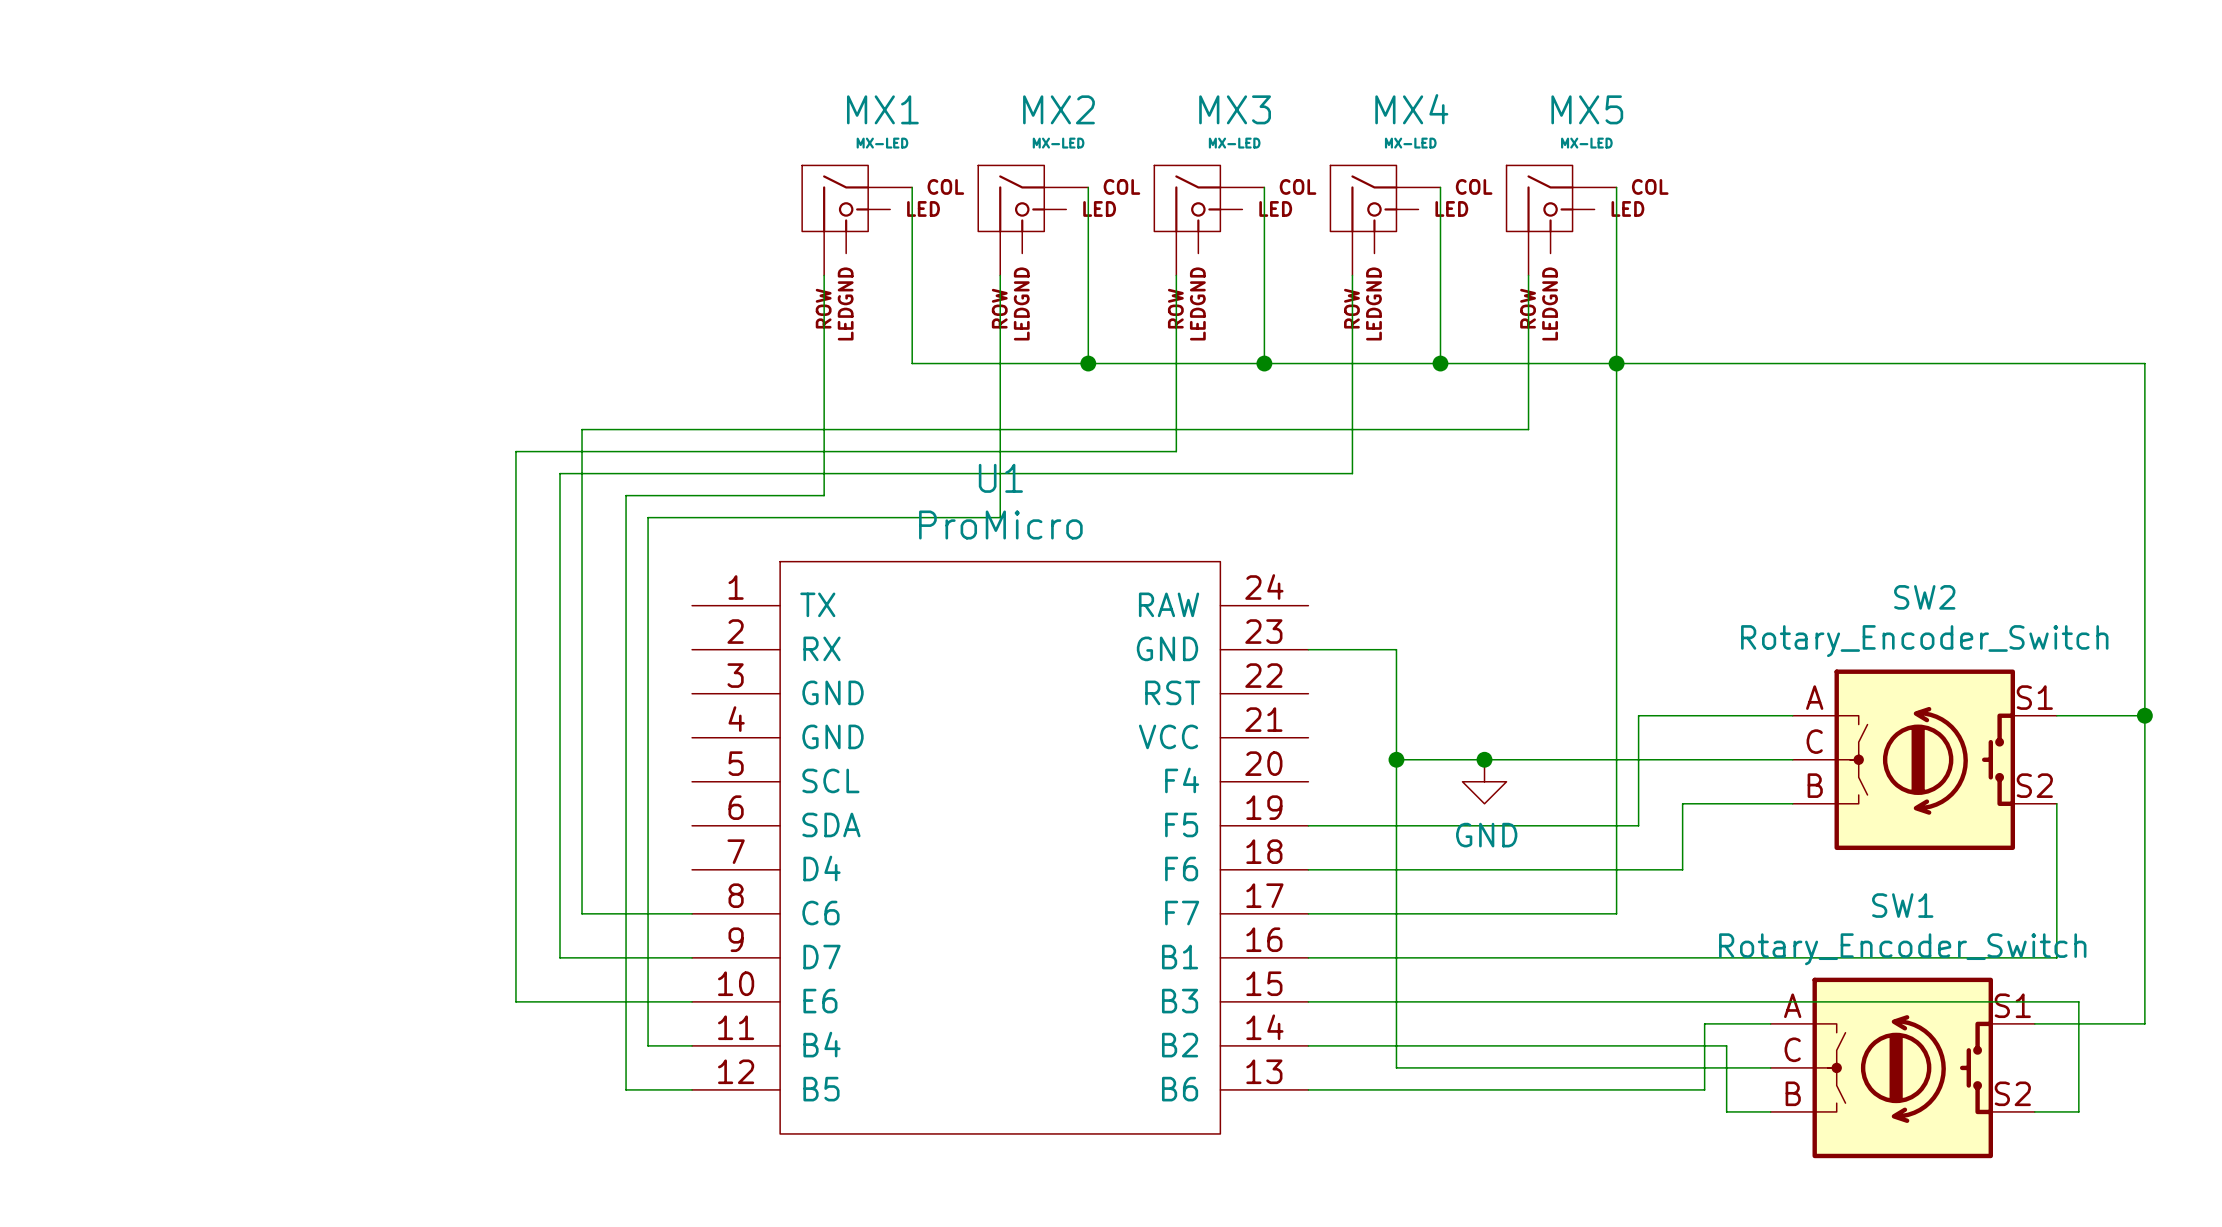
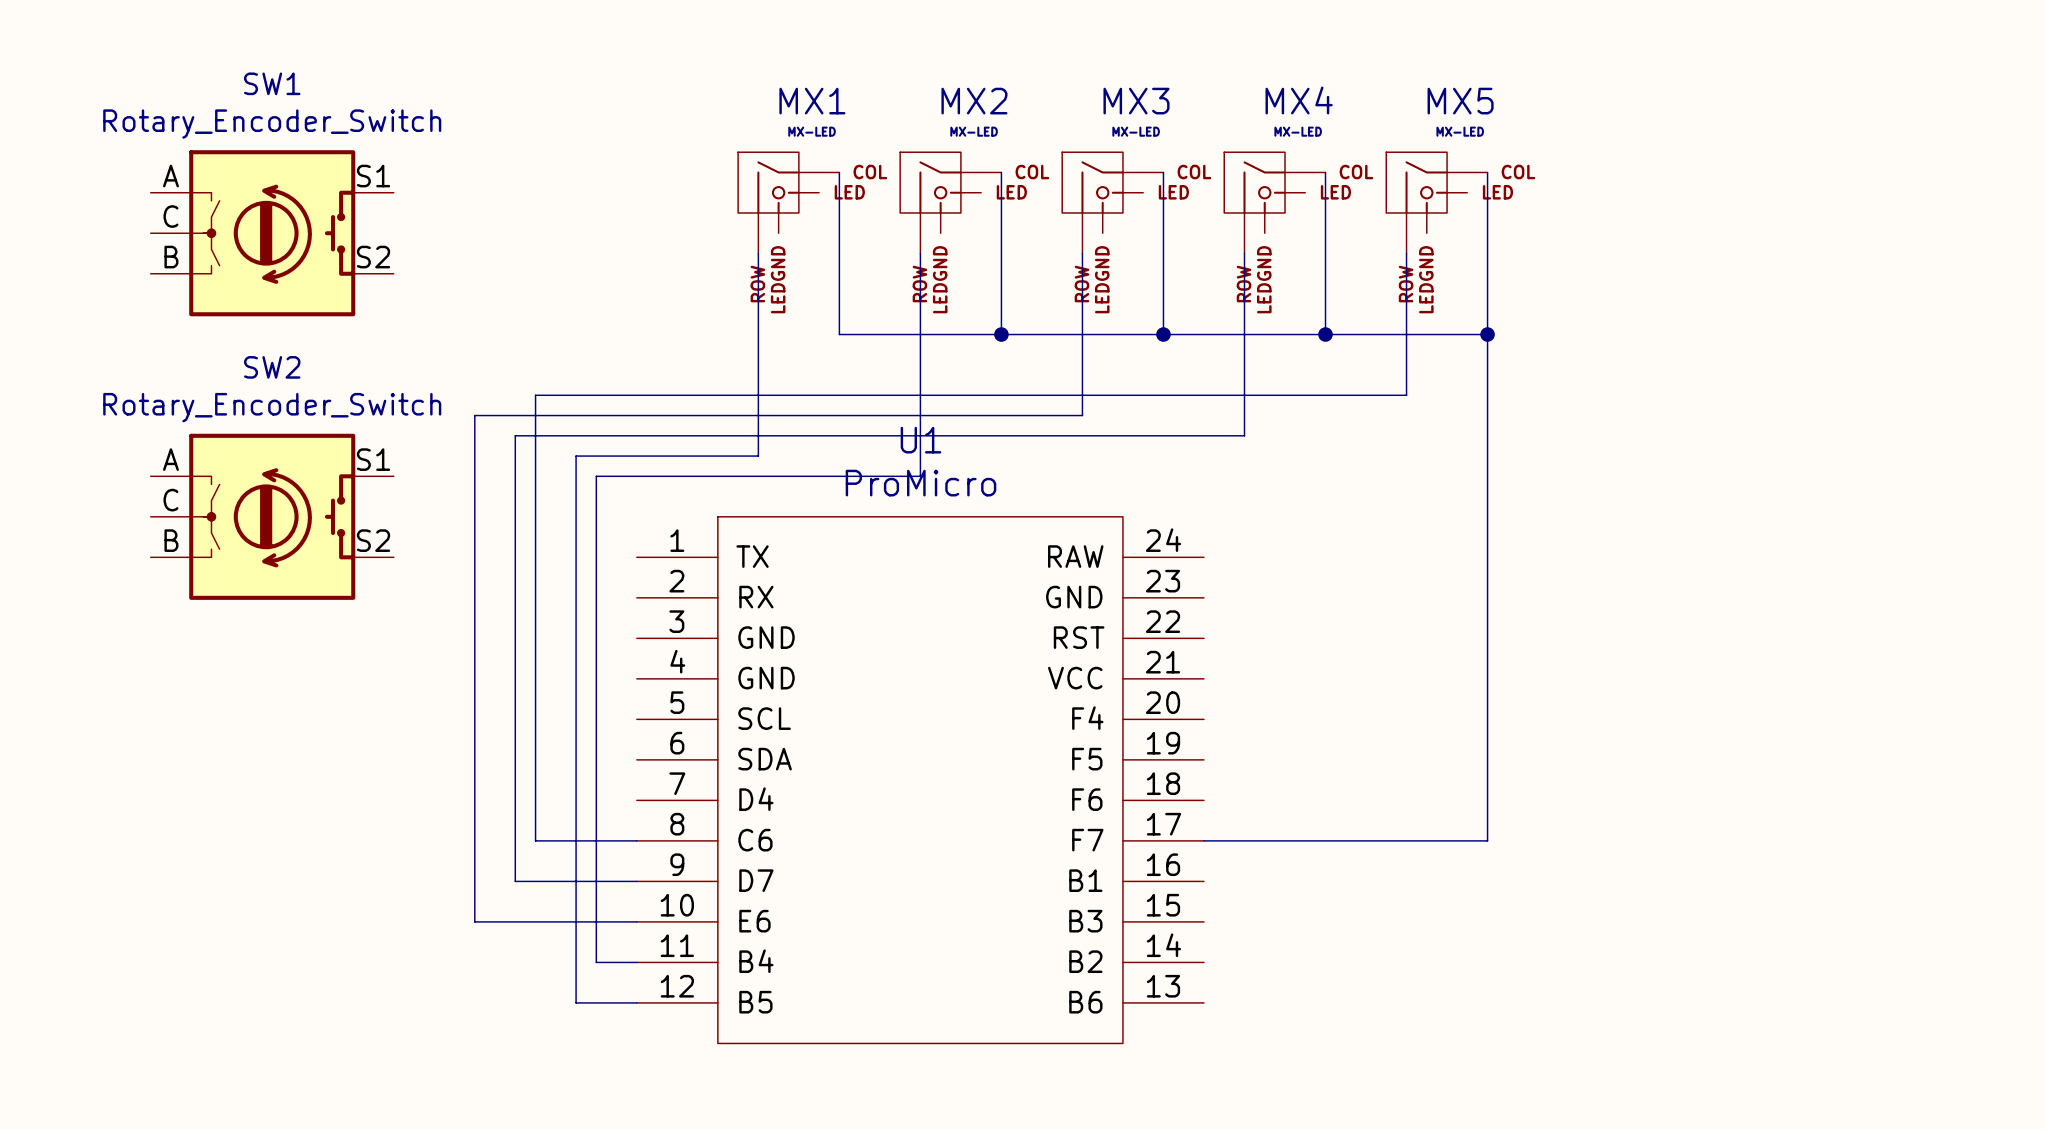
wire: (1616, 363) (2144, 363) (2144, 1023) (2034, 1023) -> none
wire: (1308, 649) (1396, 649) (1396, 1067) (1770, 1067) -> none
wire: (1792, 715) (1638, 715) (1638, 825) (1308, 825) -> none
wire: (2056, 715) (2144, 715) -> none
junction: (2144, 715) -> none
wire: (1396, 759) (1792, 759) -> none
junction: (1396, 759) -> none
junction: (1484, 759) -> none
SW2 position: (1924, 759) -> (272, 516)
power symbol: GND (1484, 781) -> none
wire: (1792, 803) (1682, 803) (1682, 869) (1308, 869) -> none
wire: (2056, 803) (2056, 957) (1308, 957) -> none
wire: (1308, 1001) (2078, 1001) (2078, 1111) (2034, 1111) -> none
wire: (1770, 1023) (1704, 1023) (1704, 1089) (1308, 1089) -> none
wire: (1308, 1045) (1726, 1045) (1726, 1111) (1770, 1111) -> none
SW1 position: (1902, 1067) -> (272, 233)

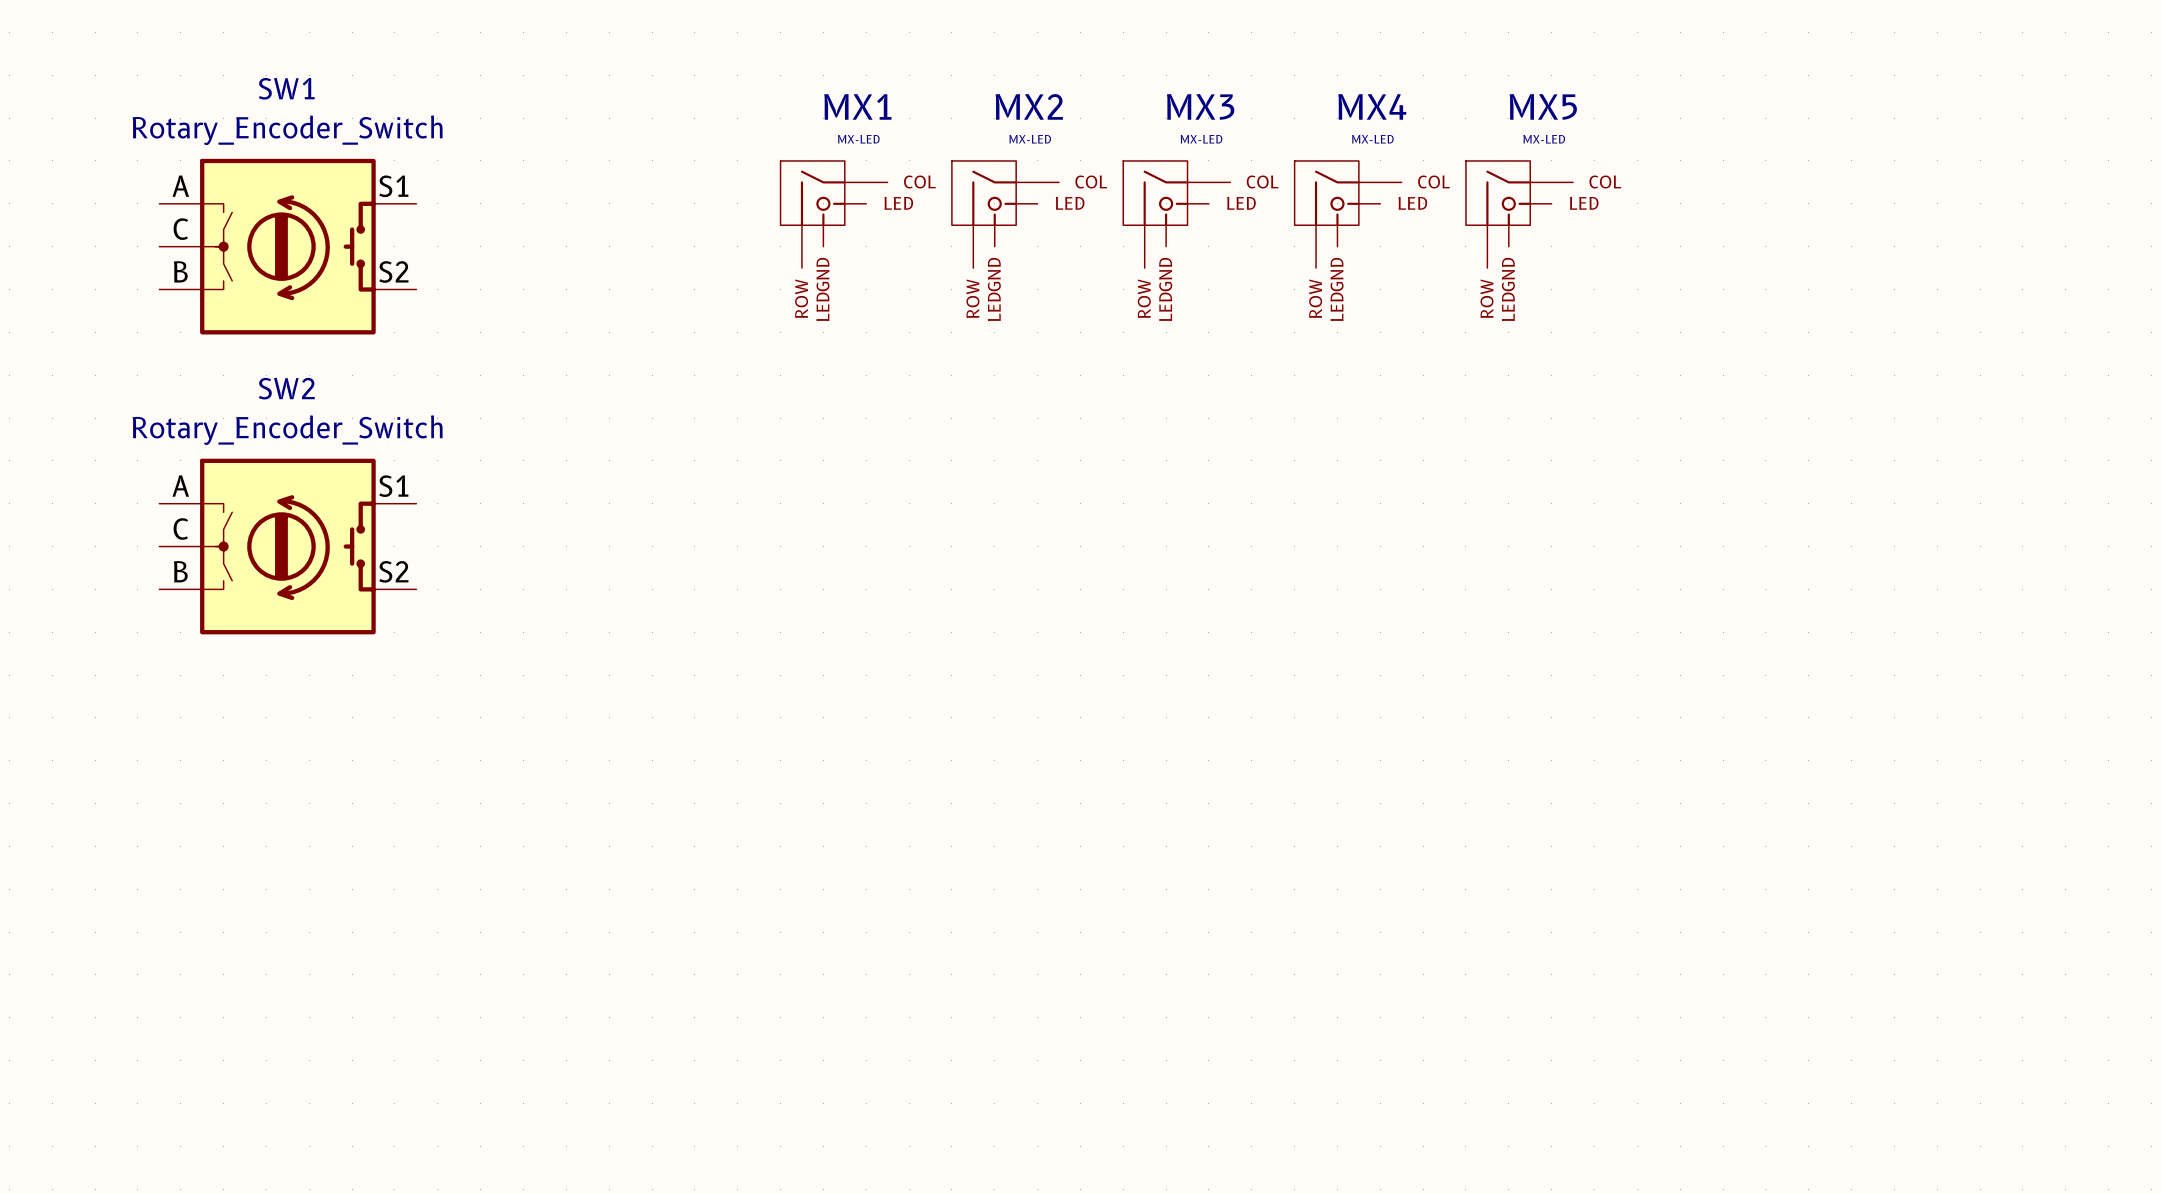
wire: (839, 172) (839, 334) (1487, 334) -> none
wire: (1001, 172) (1001, 334) -> none
wire: (1163, 172) (1163, 334) -> none
wire: (1325, 172) (1325, 334) -> none
wire: (1487, 172) (1487, 840) (1203, 840) -> none
wire: (758, 253) (758, 456) (576, 456) (576, 1002) (636, 1002) -> none
wire: (920, 253) (920, 476) (596, 476) (596, 962) (636, 962) -> none
wire: (1082, 253) (1082, 415) (474, 415) (474, 921) (636, 921) -> none
wire: (1244, 253) (1244, 435) (515, 435) (515, 881) (636, 881) -> none
wire: (1406, 253) (1406, 395) (535, 395) (535, 840) (636, 840) -> none
junction: (1001, 334) -> none
junction: (1163, 334) -> none
junction: (1325, 334) -> none
junction: (1487, 334) -> none
U1: ProMicro (920, 780) -> none

